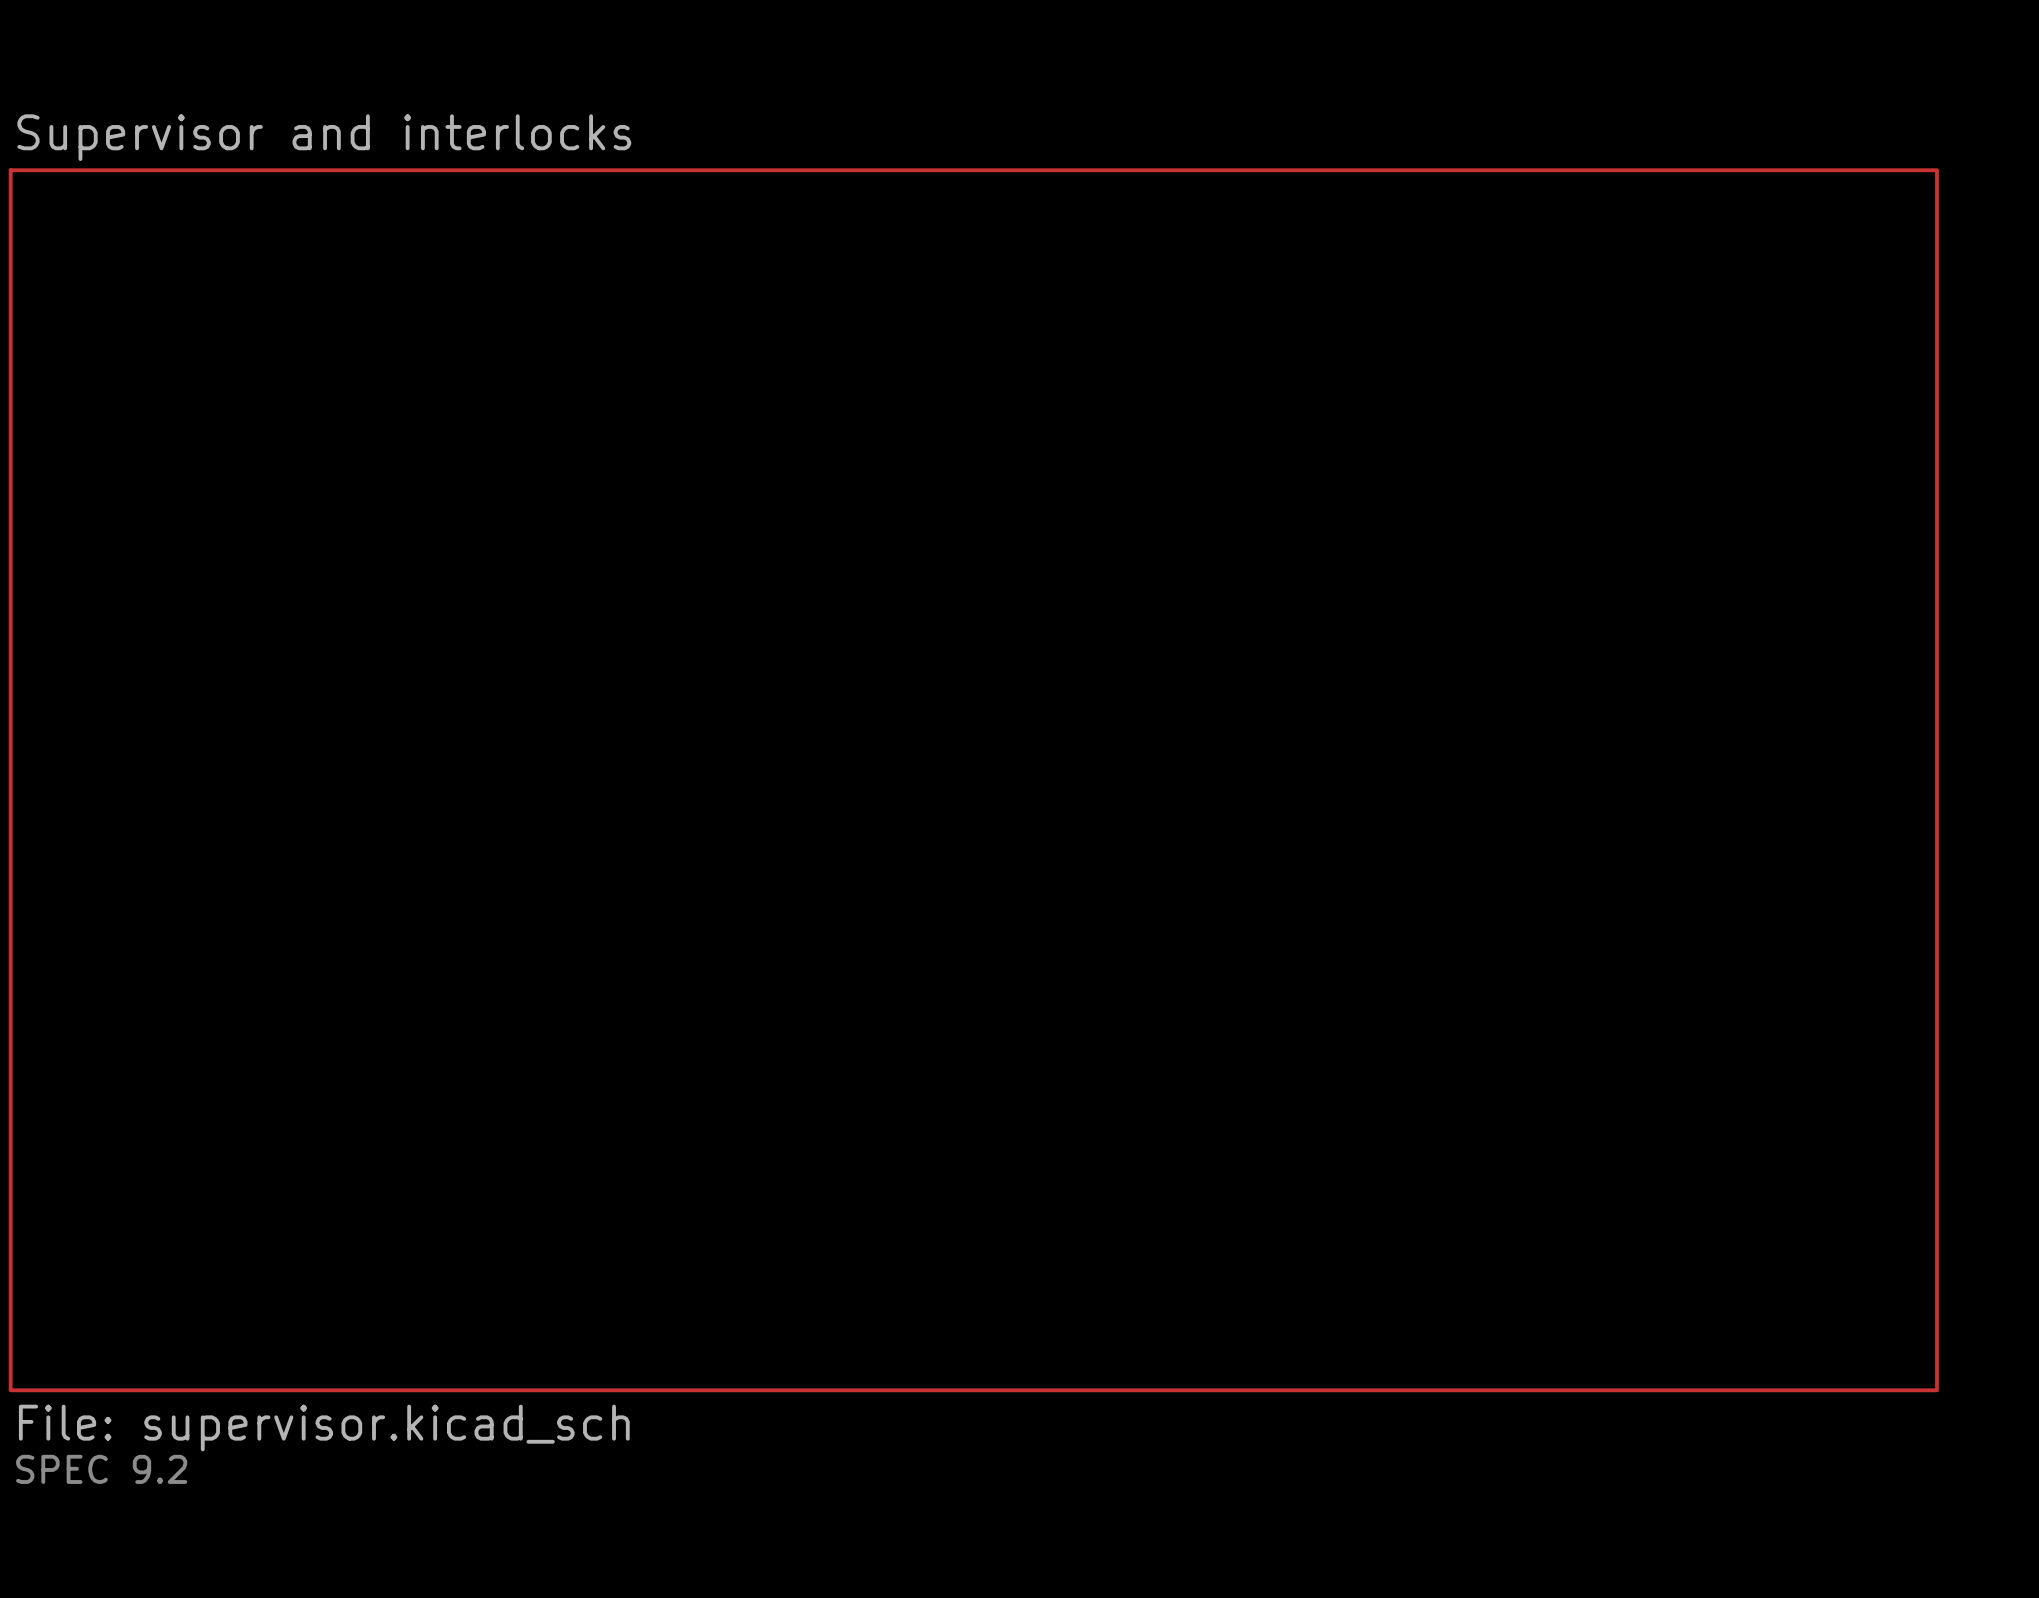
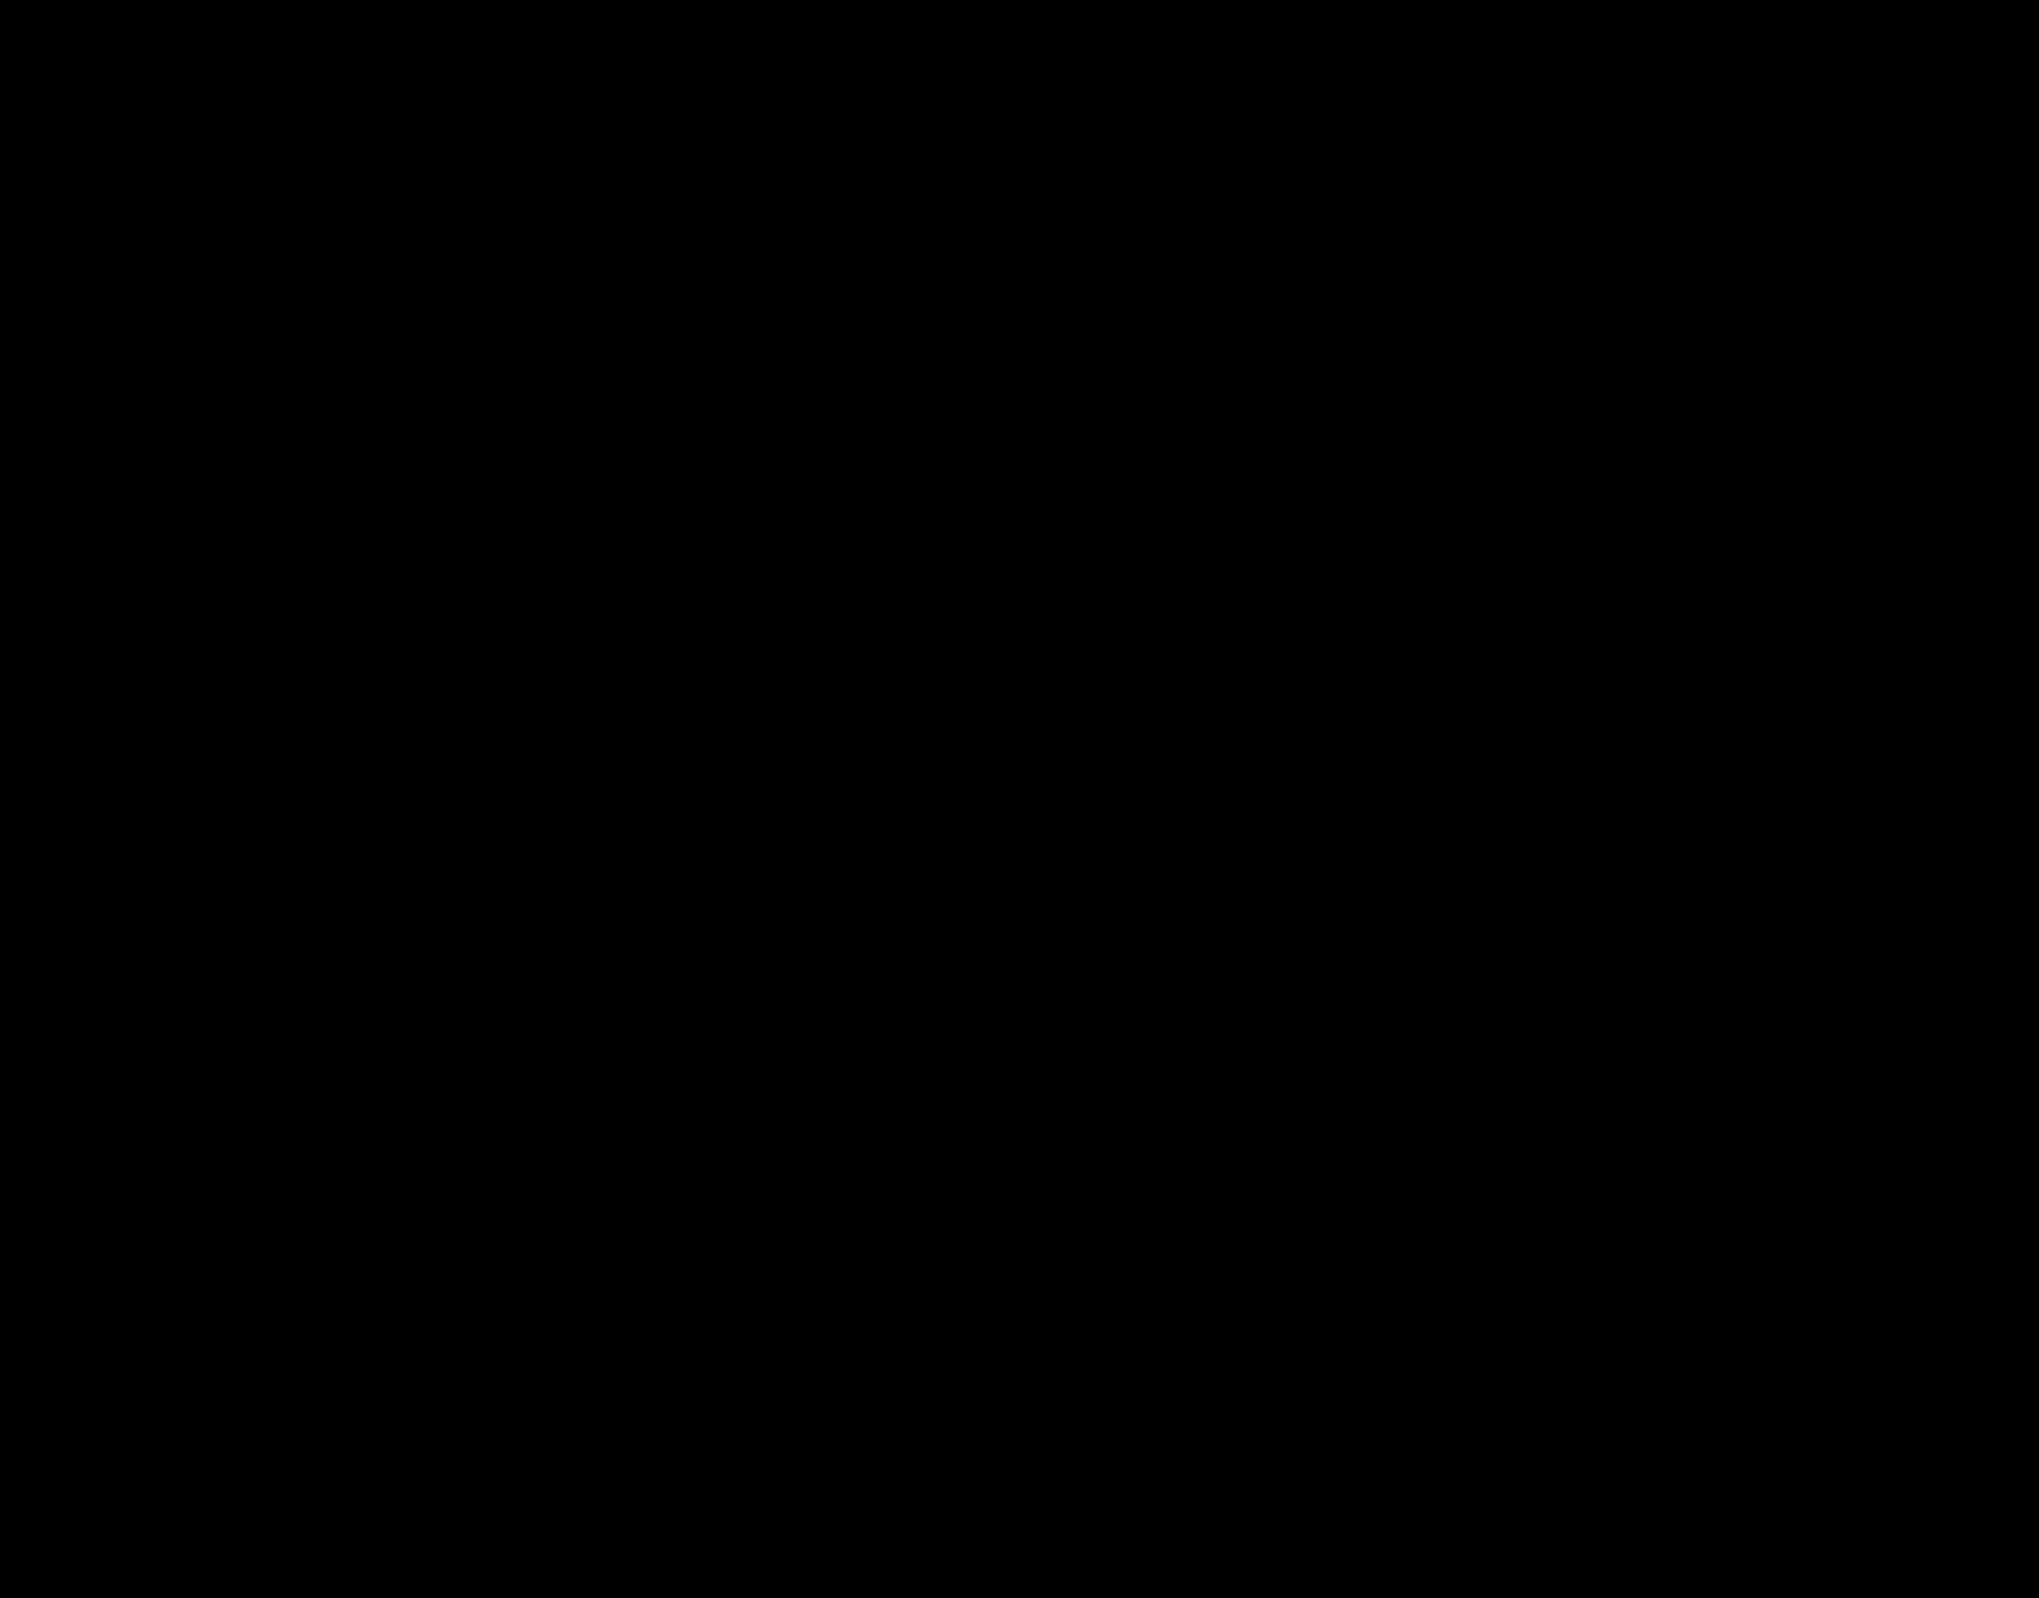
sheet Supervisor and interlocks: File: supervisor.kicad_sch (973, 780) -> none
text: SPEC 9.2 (101, 1469) -> none

